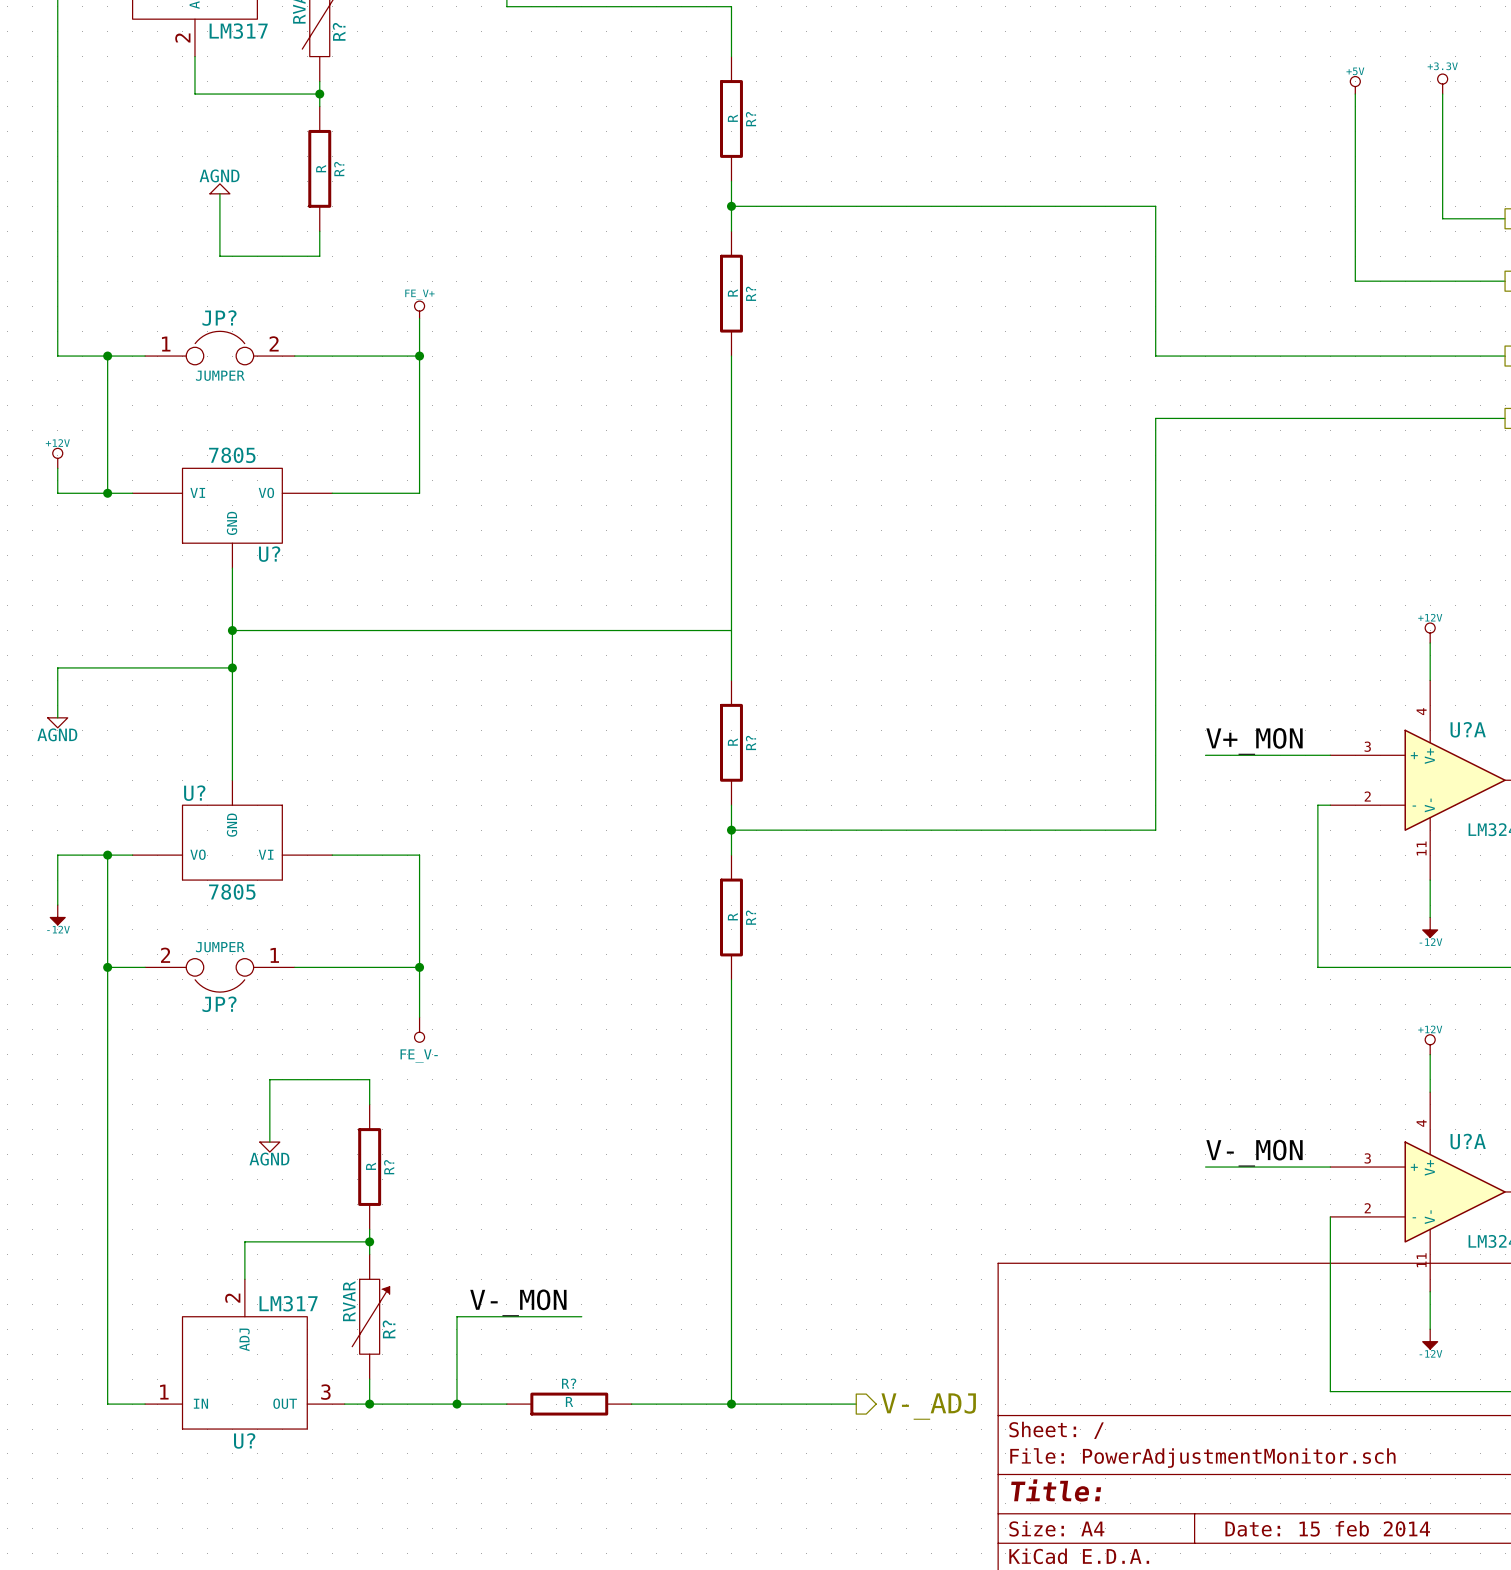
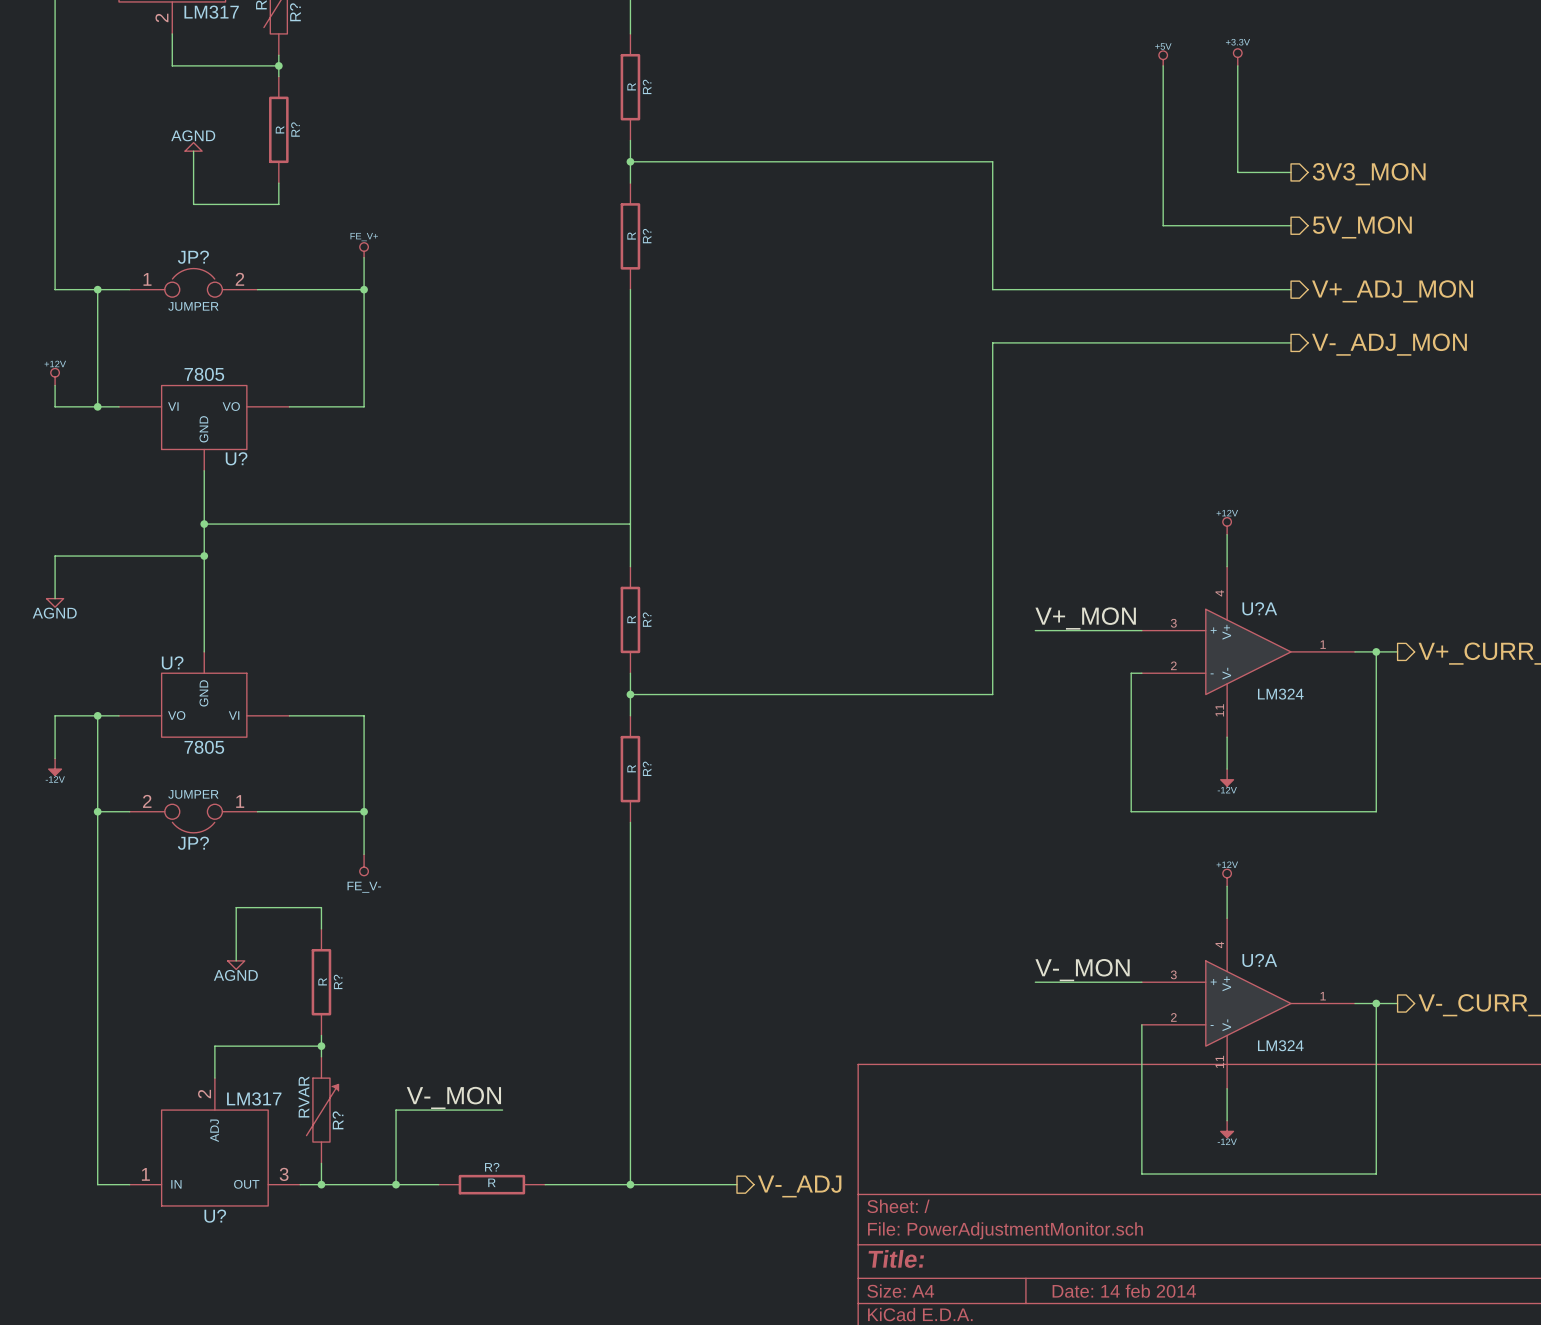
title block: Date: 15 feb 2014 (1327, 1528) -> Date: 14 feb 2014 (1124, 1291)

